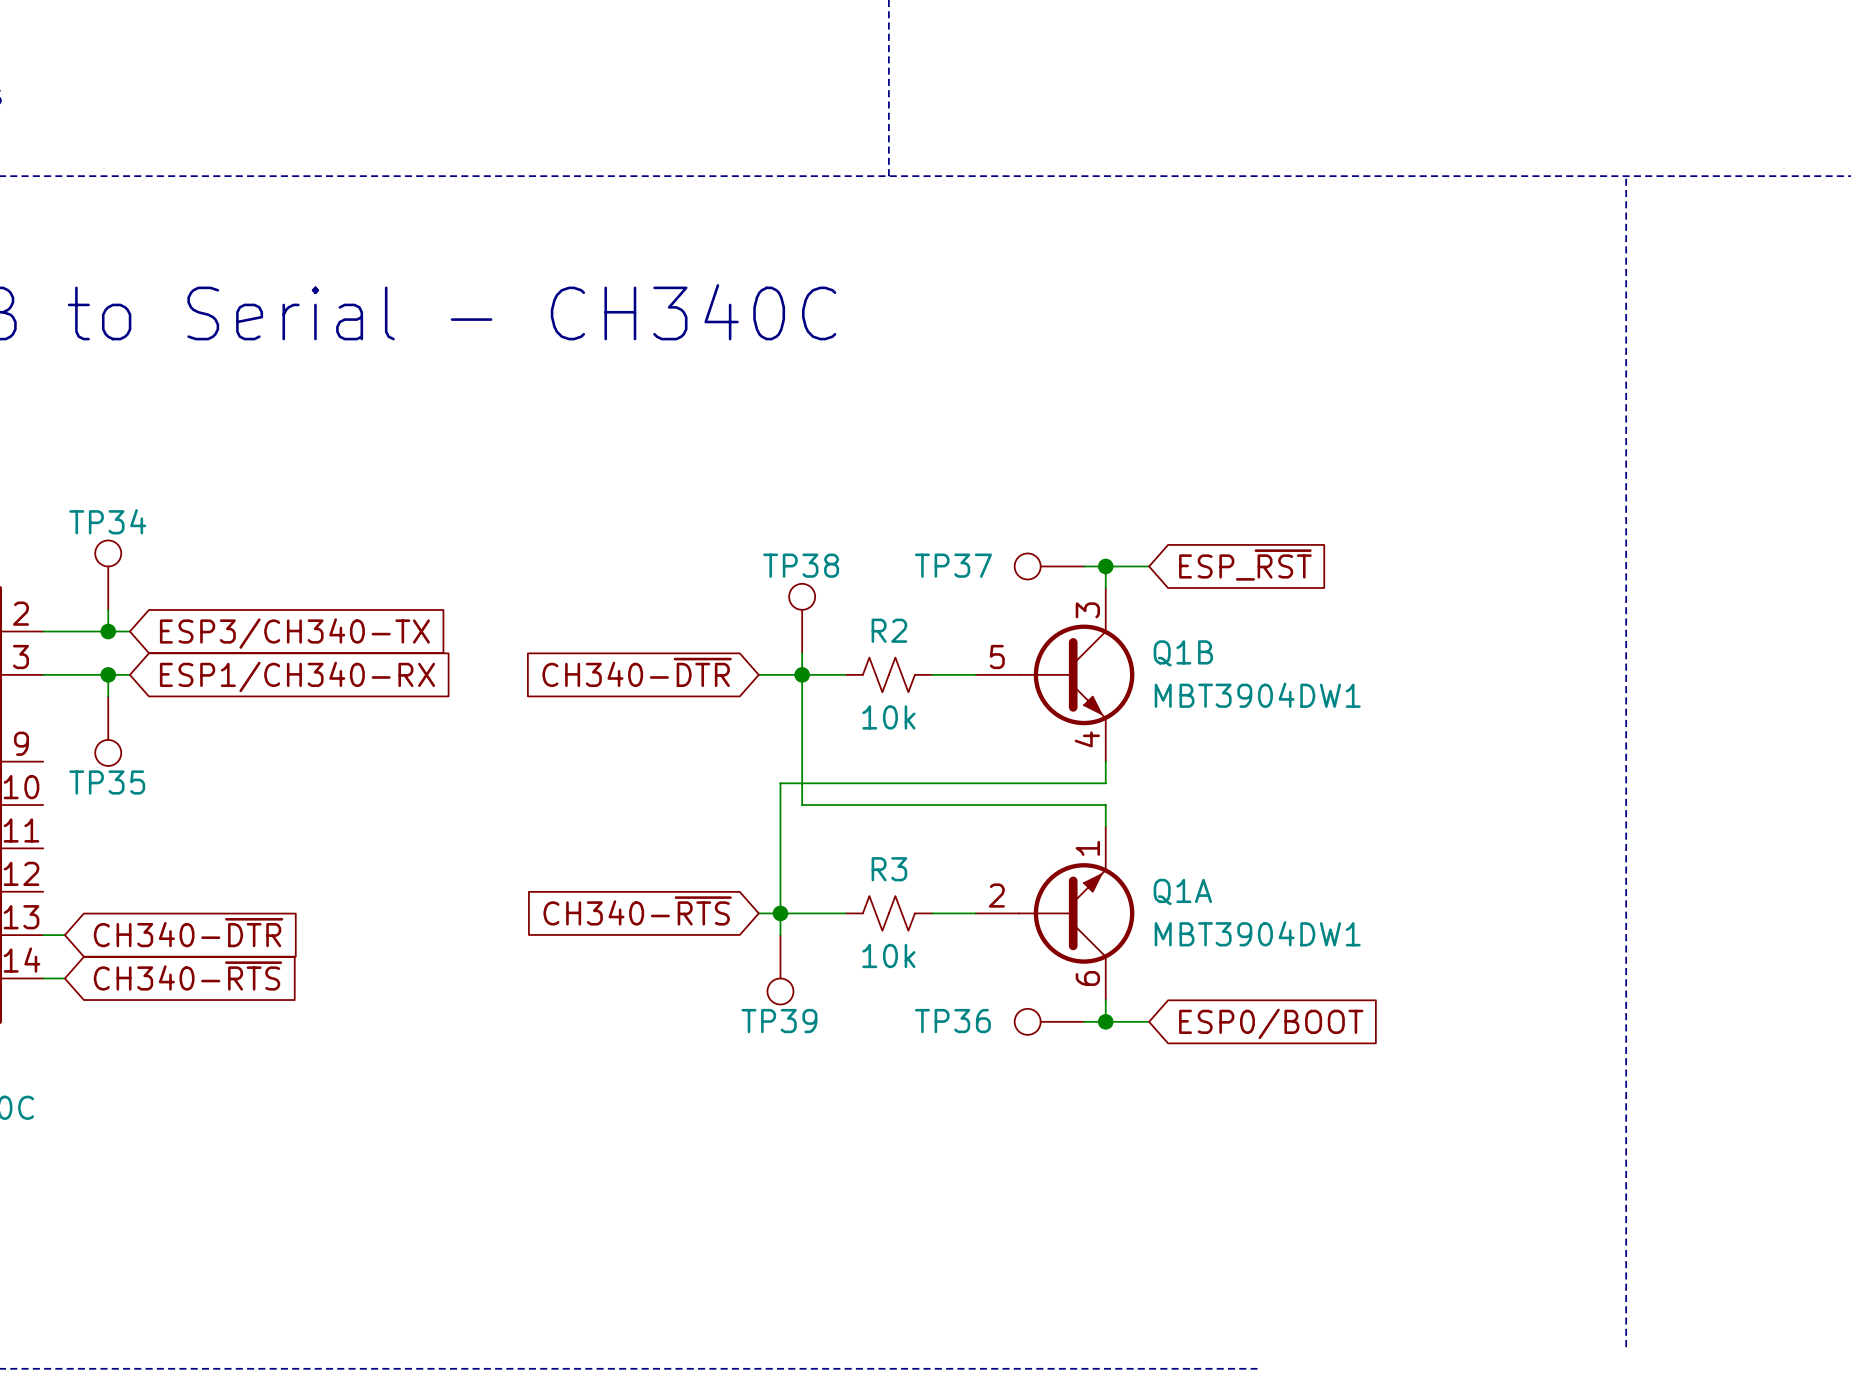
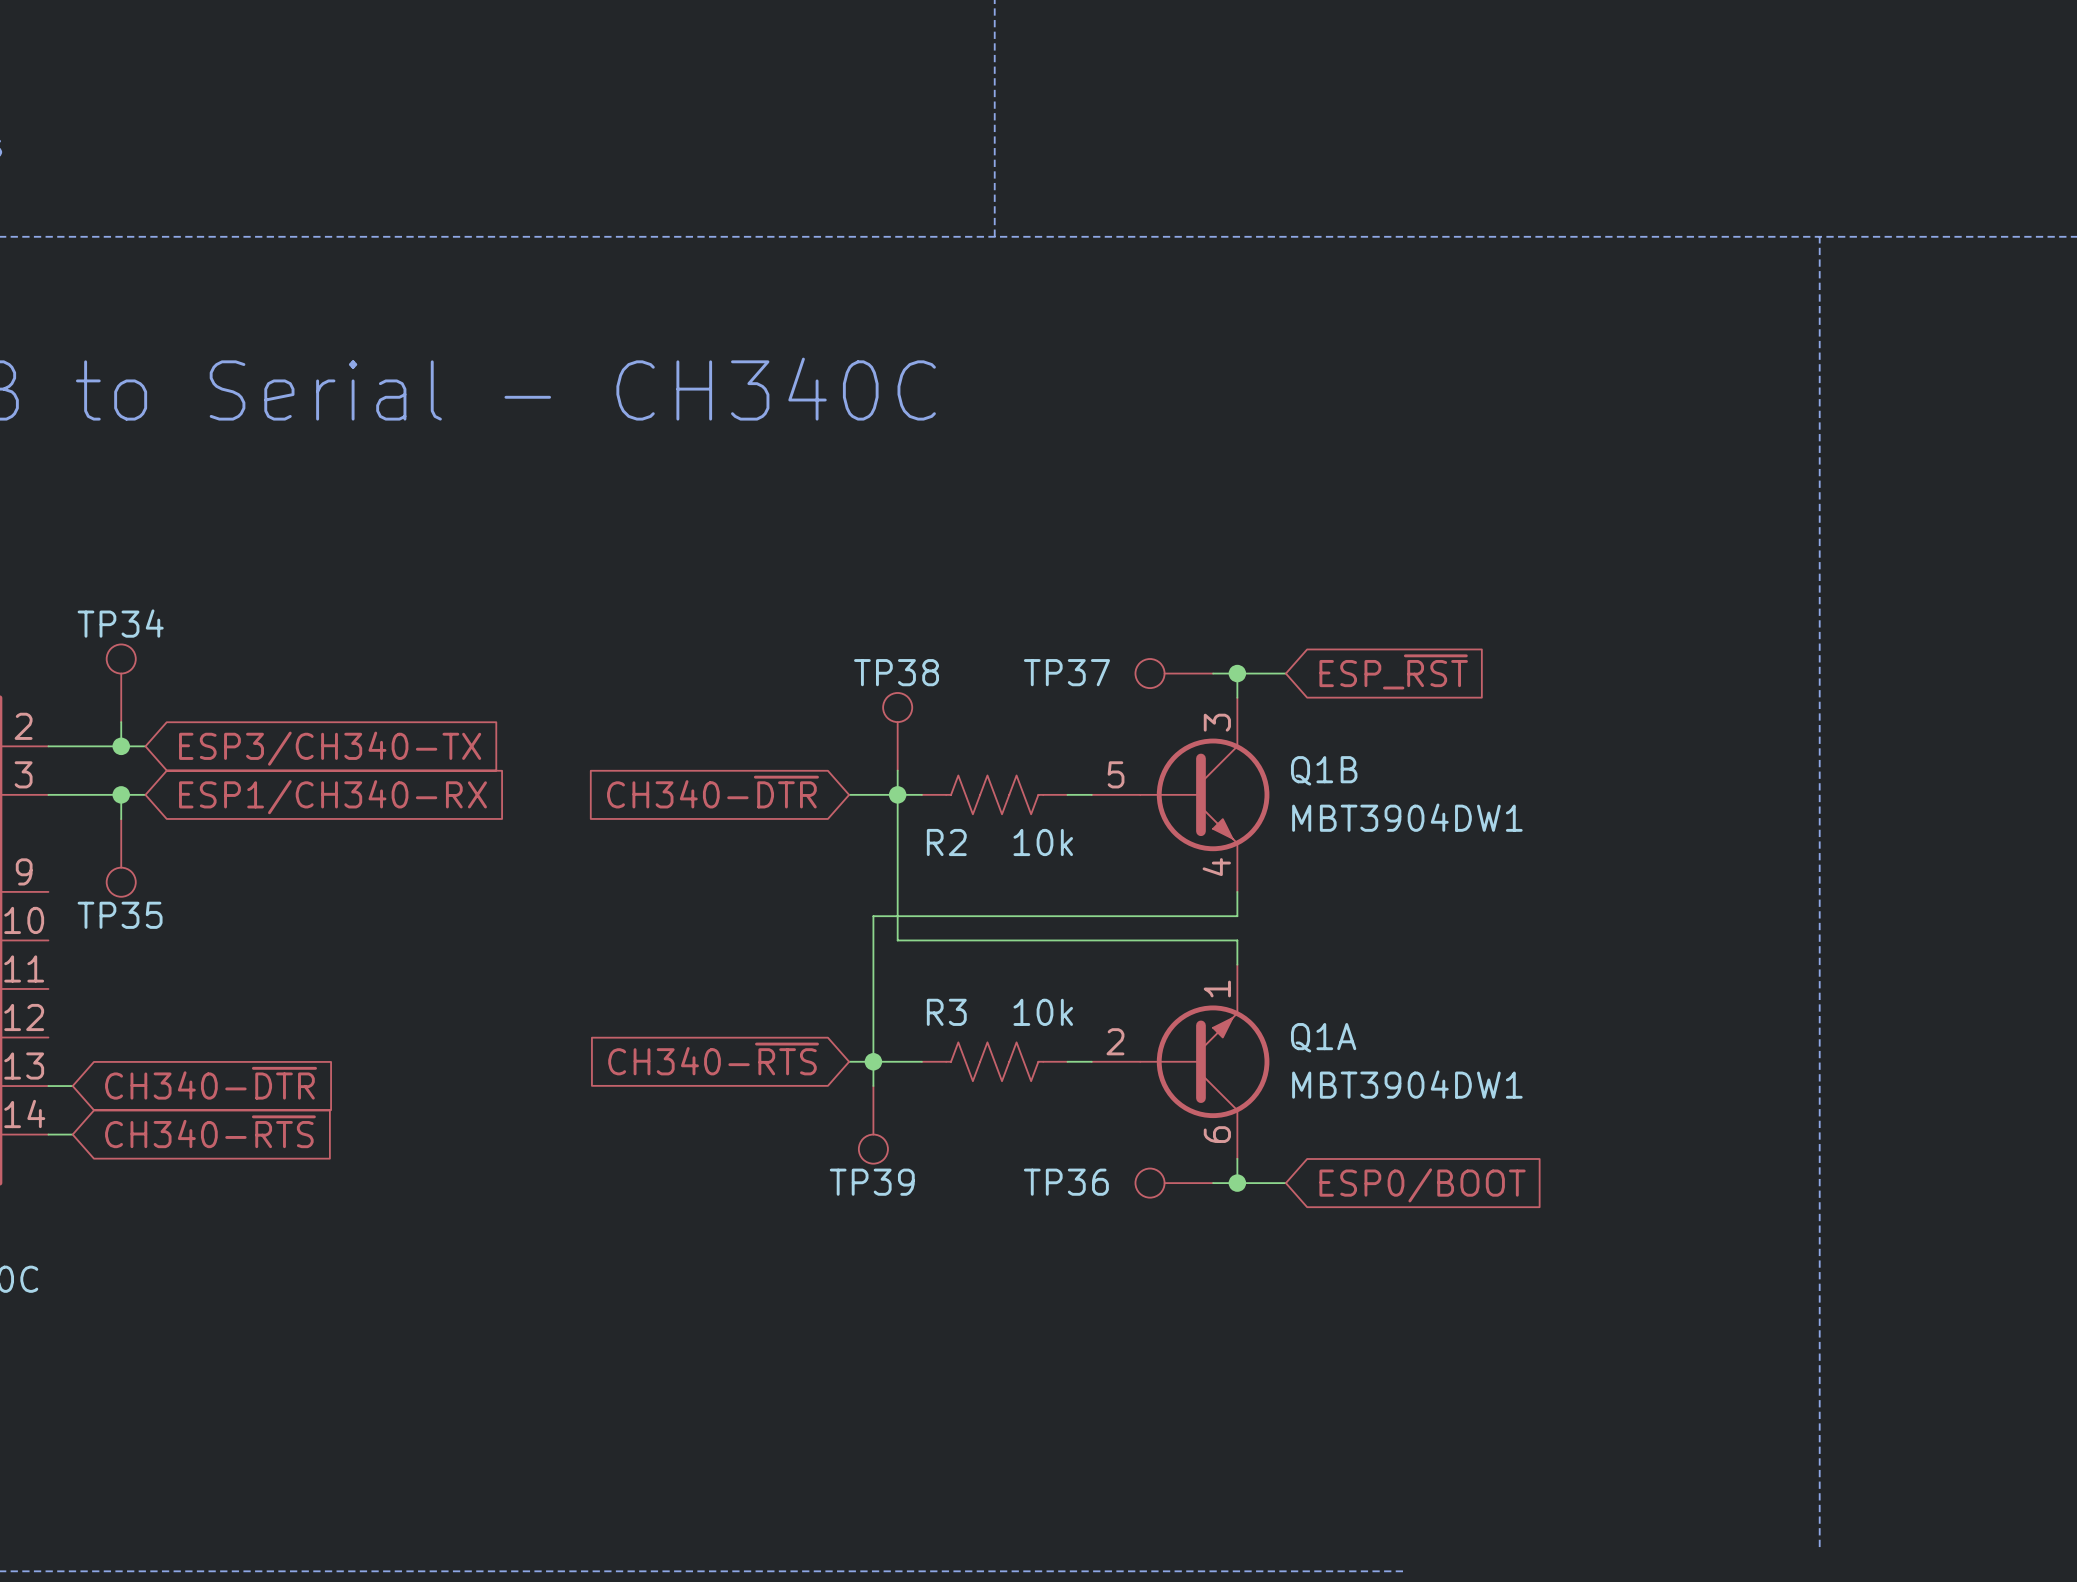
R2 name position: R2 (889, 630) -> R2 (946, 842)
R2 symbol: [845, 657, 933, 693] -> [921, 775, 1068, 815]
R2 value position: 10k (888, 717) -> 10k (1043, 842)
R3 name position: R3 (889, 869) -> R3 (946, 1012)
R3 symbol: [845, 896, 933, 931] -> [921, 1042, 1068, 1082]
R3 value position: 10k (888, 955) -> 10k (1043, 1012)

